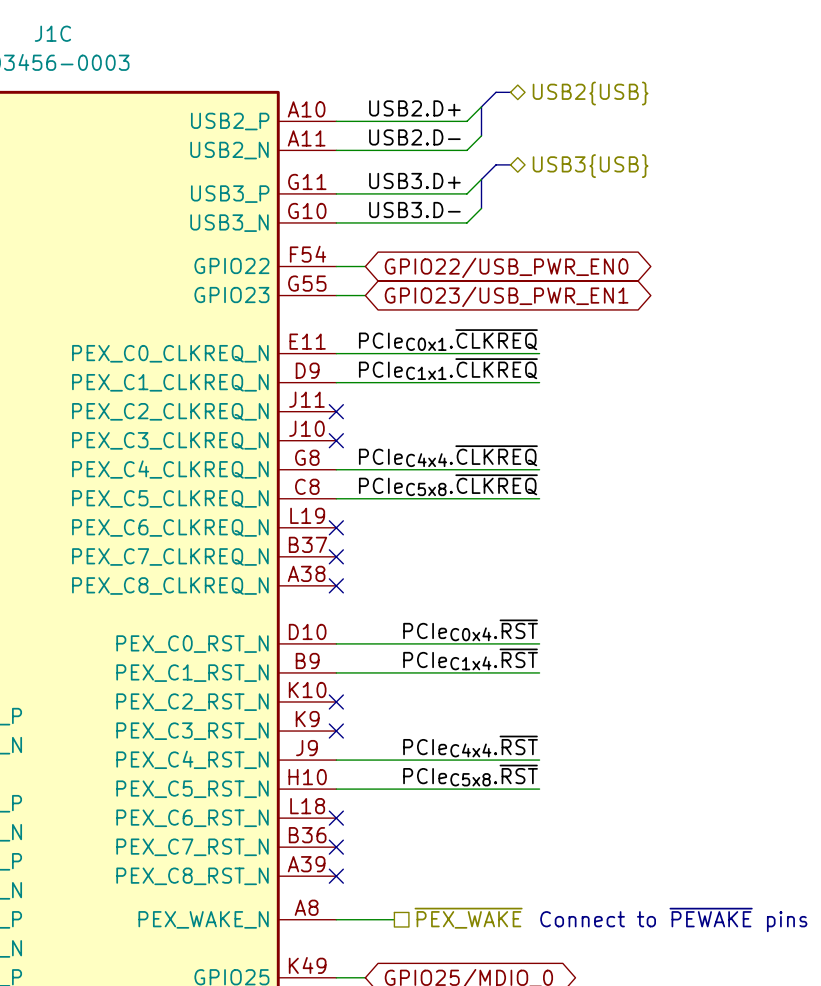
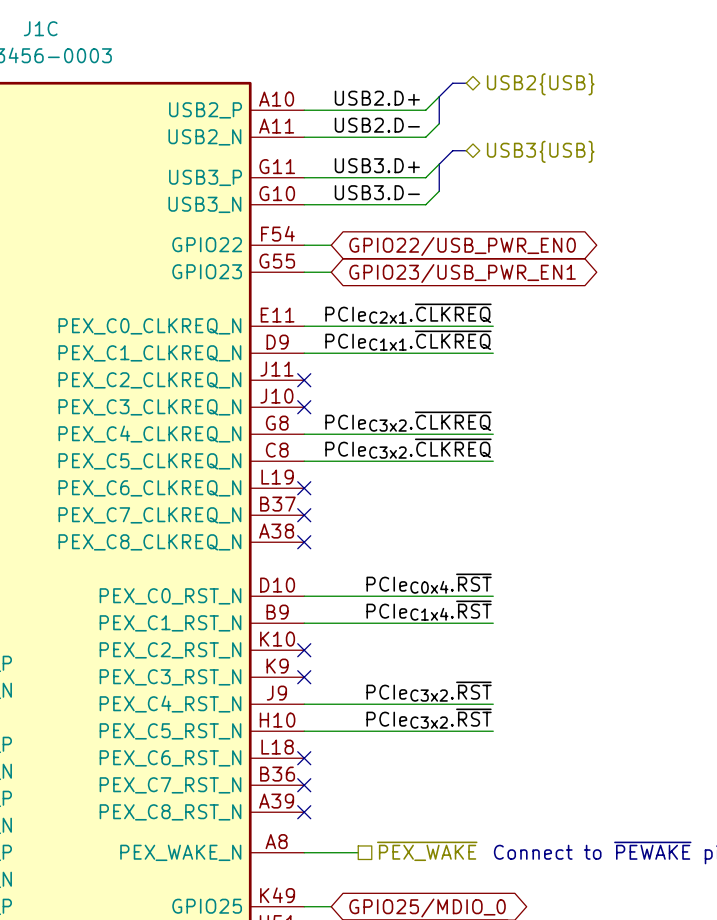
label: PCIeC0x1.~{CLKREQ} (448, 340) -> PCIeC2x1.~{CLKREQ} (408, 313)
label: PCIeC4x4.~{CLKREQ} (448, 456) -> PCIeC3x2.~{CLKREQ} (408, 421)
label: PCIeC5x8.~{CLKREQ} (448, 485) -> PCIeC3x2.~{CLKREQ} (408, 448)
label: PCIeC4x4.~{RST} (470, 746) -> PCIeC3x2.~{RST} (429, 691)
label: PCIeC5x8.~{RST} (470, 775) -> PCIeC3x2.~{RST} (429, 718)

